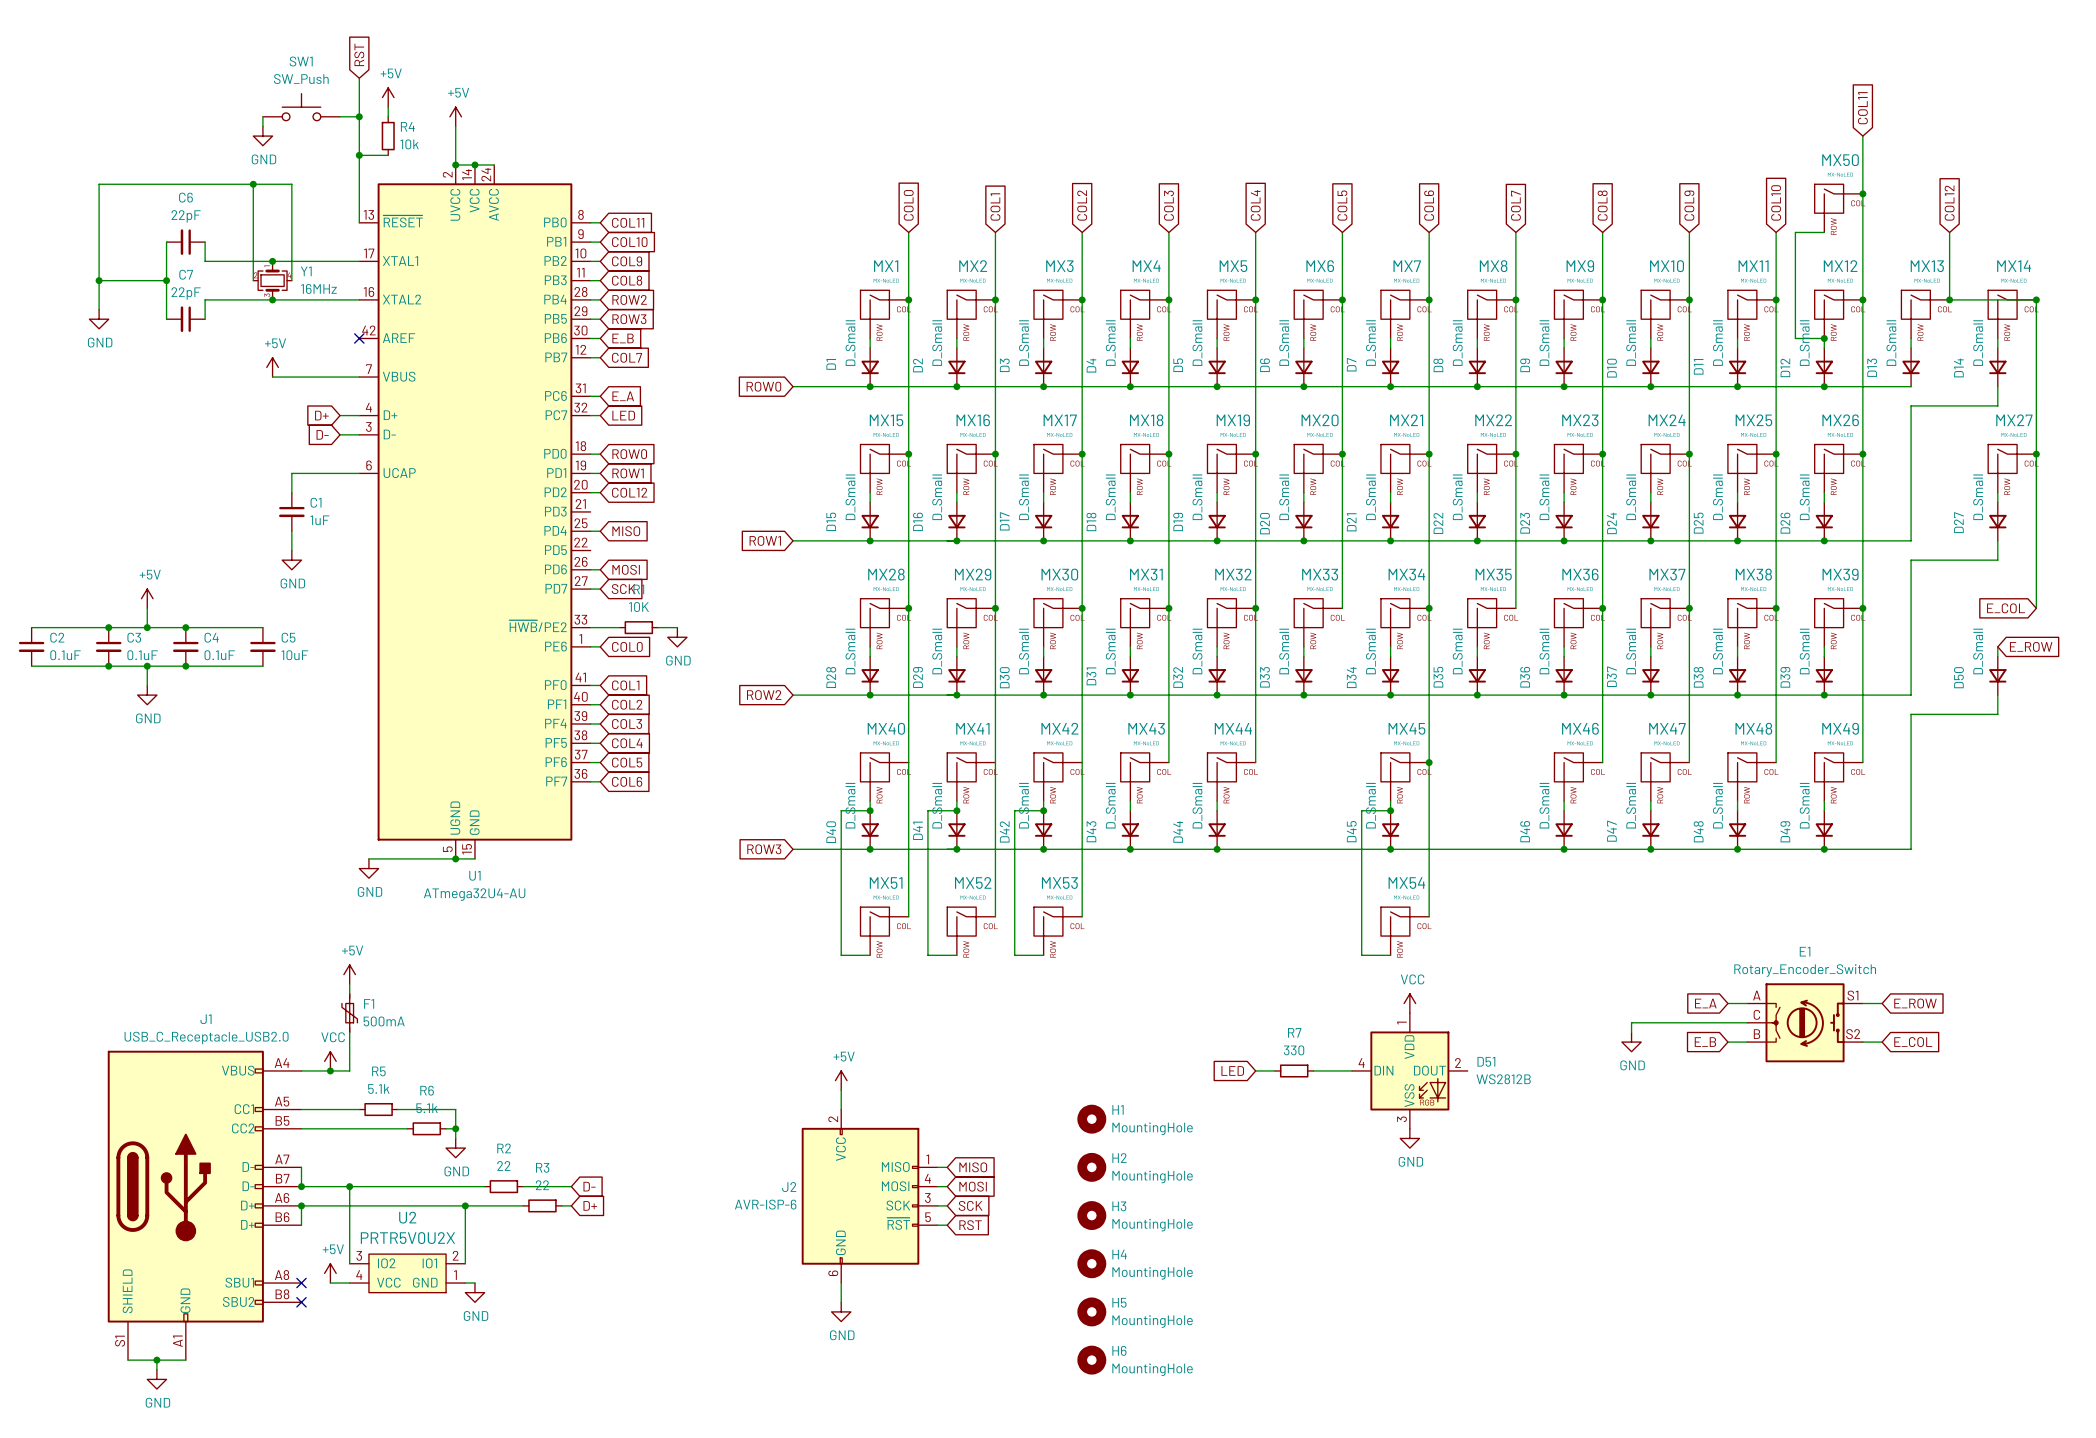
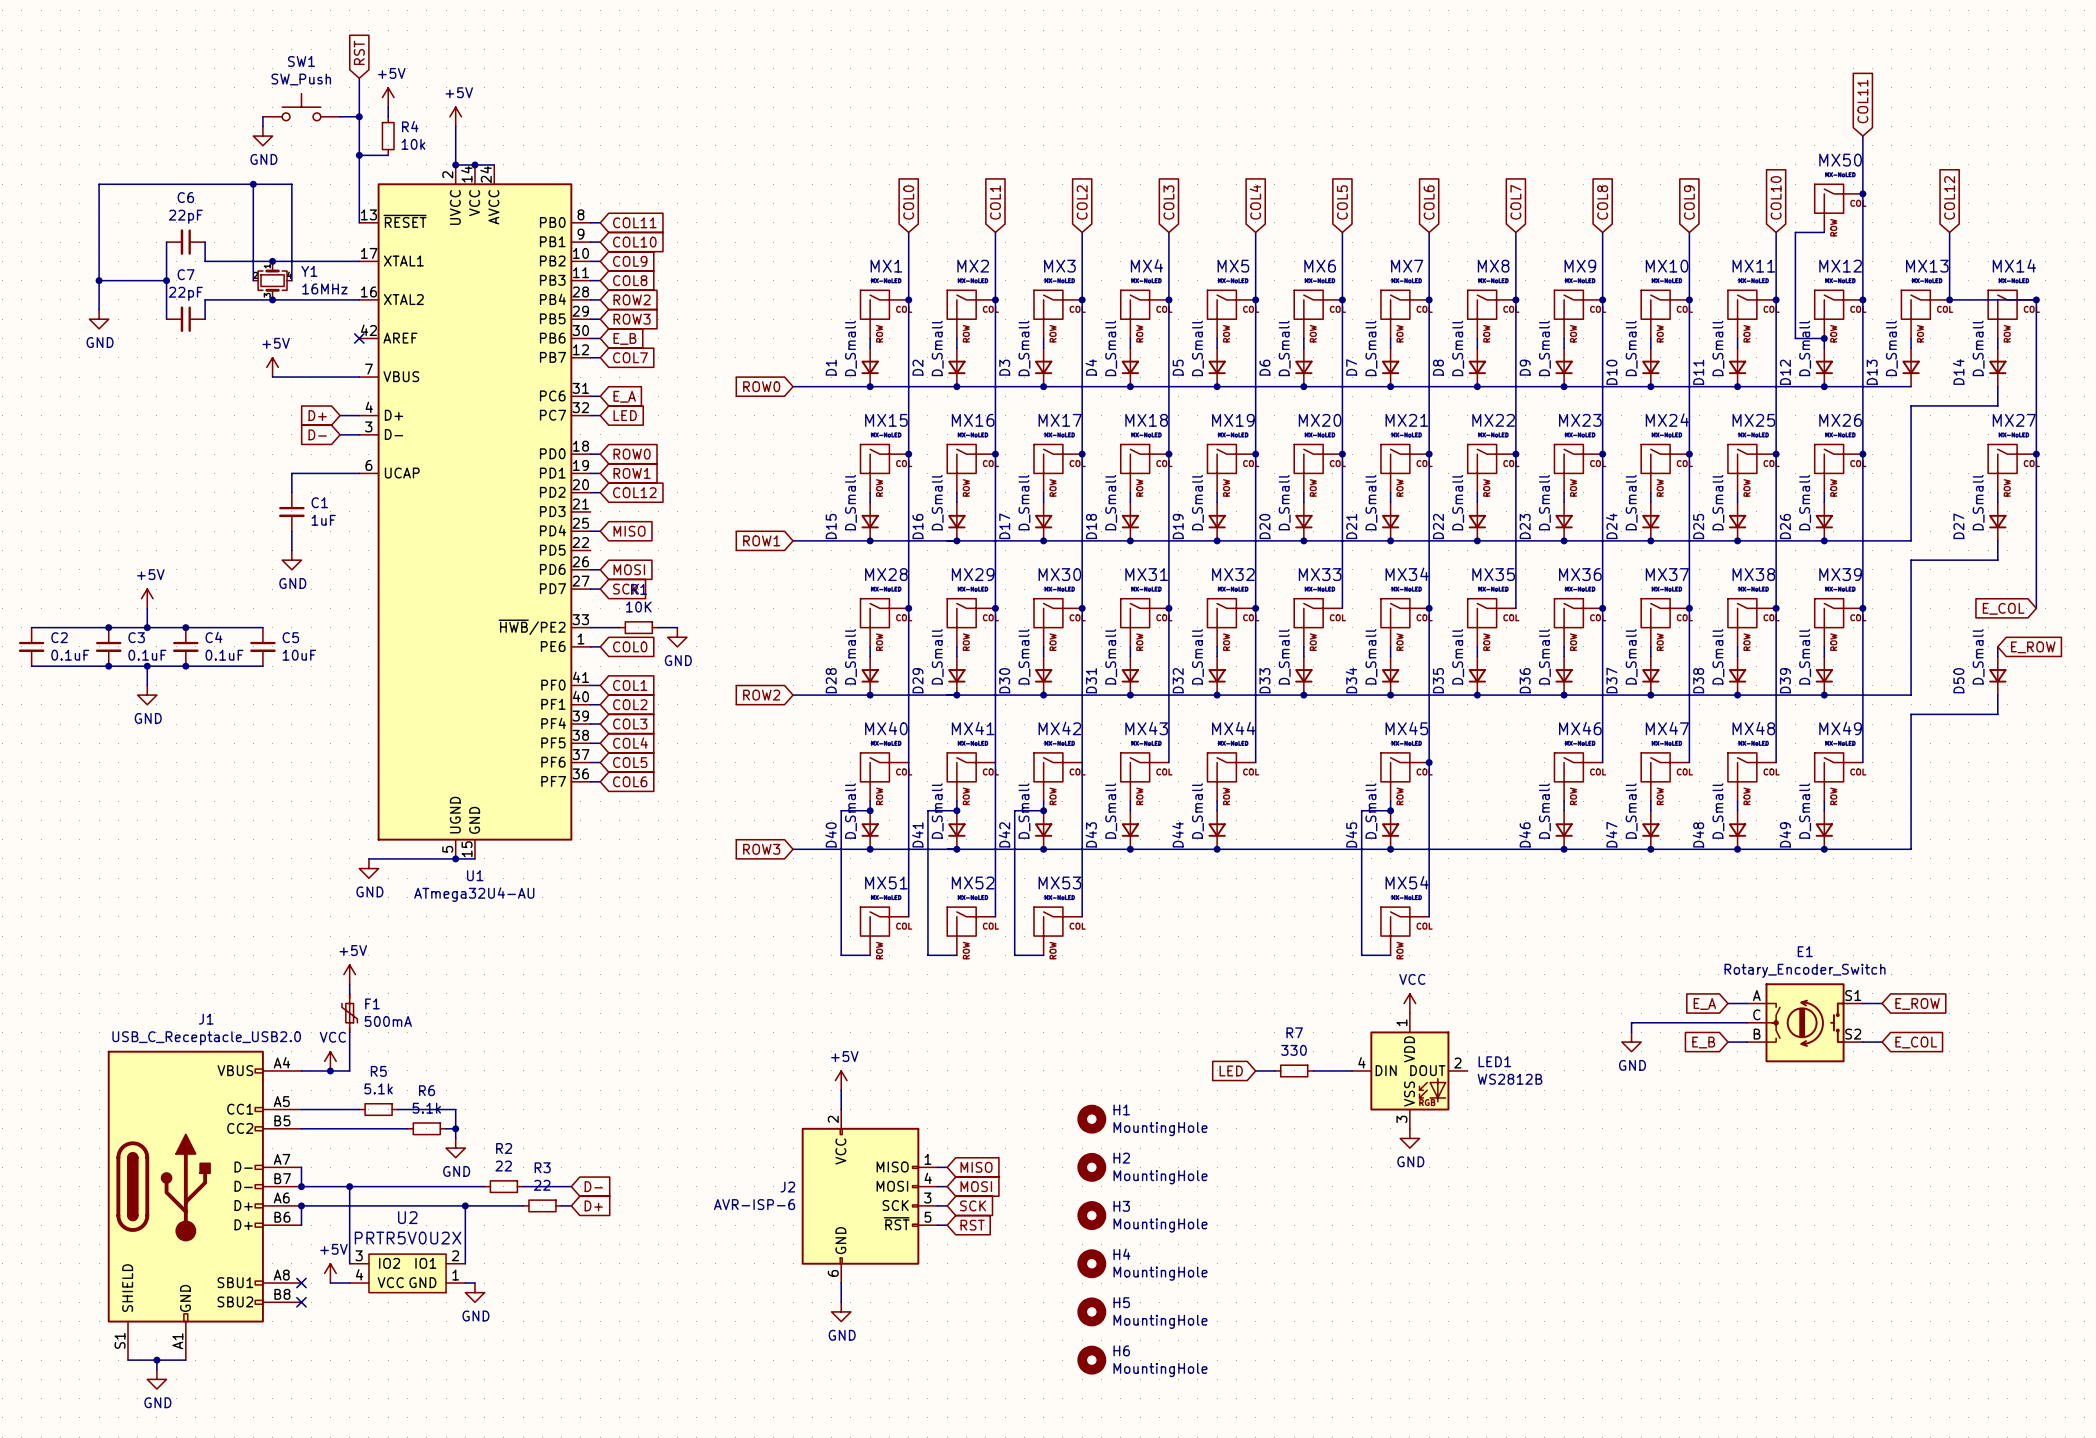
D51 name: D51 (1486, 1061) -> LED1 (1494, 1061)

